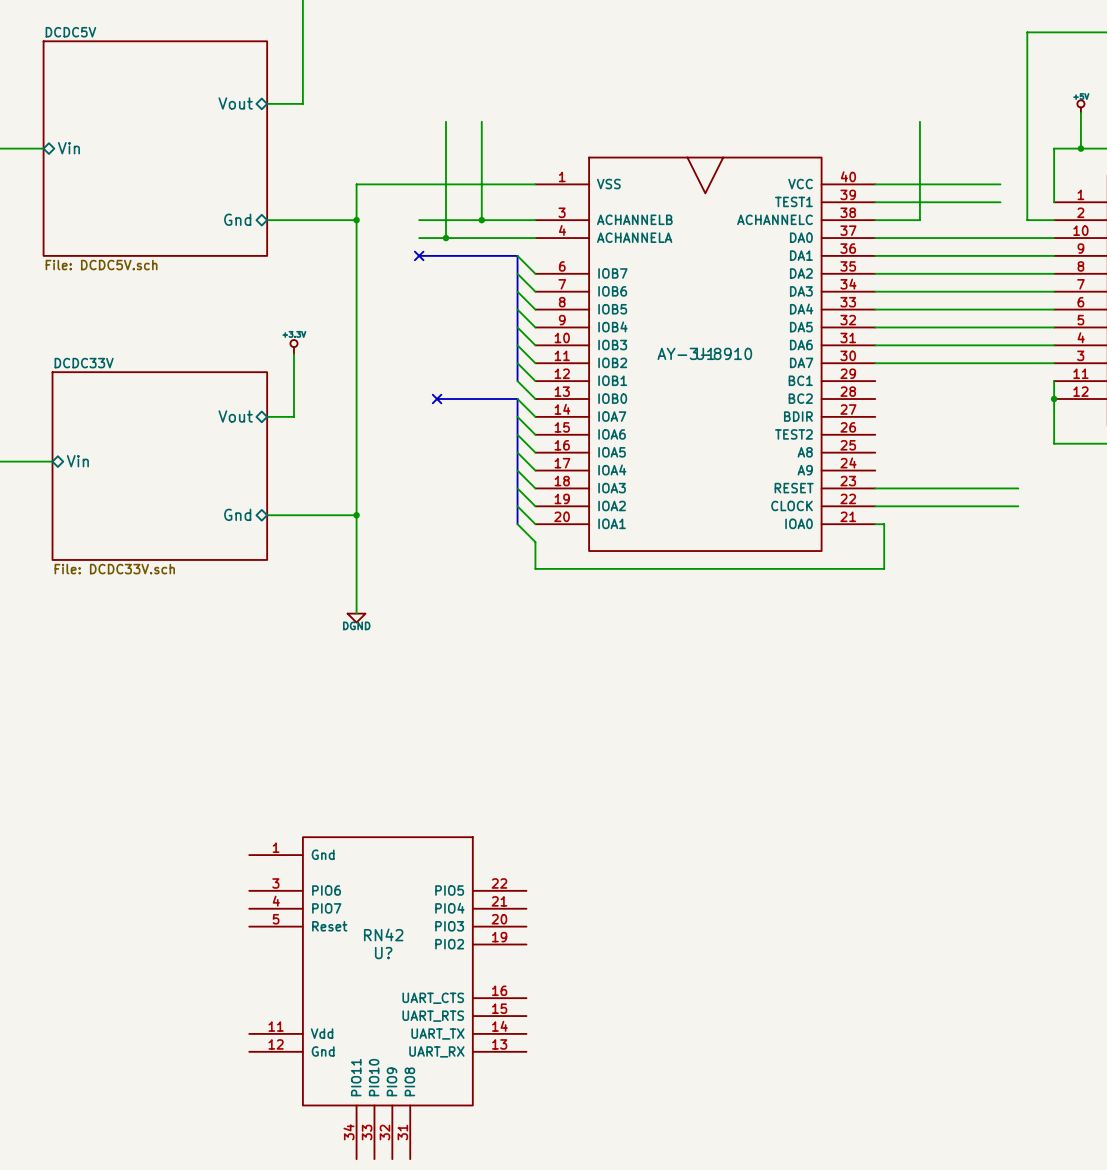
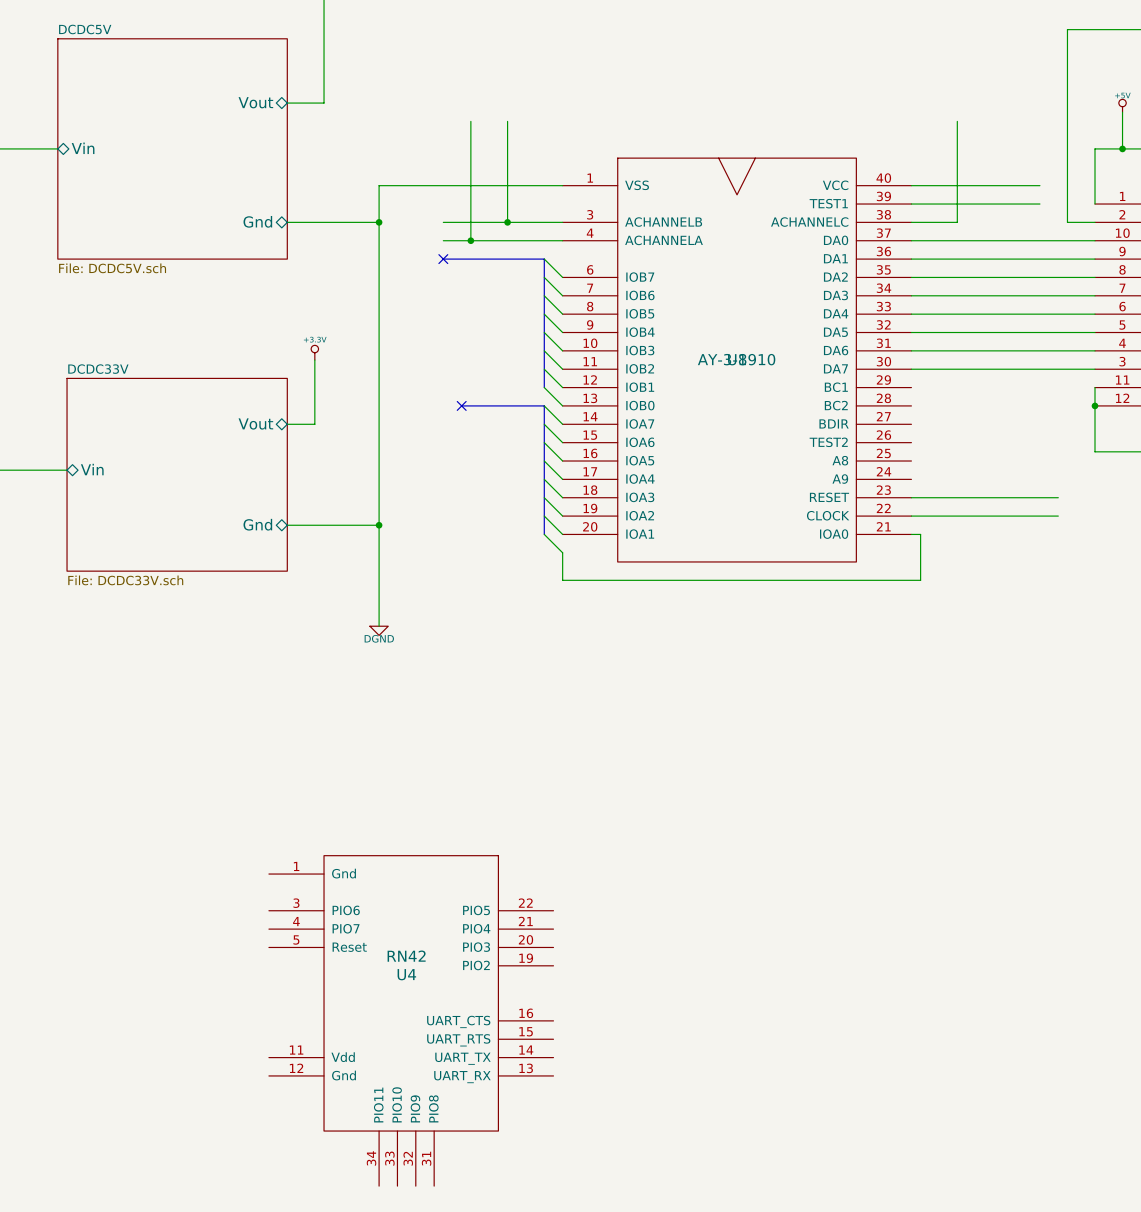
U? name: U? (383, 953) -> U4 (406, 974)

